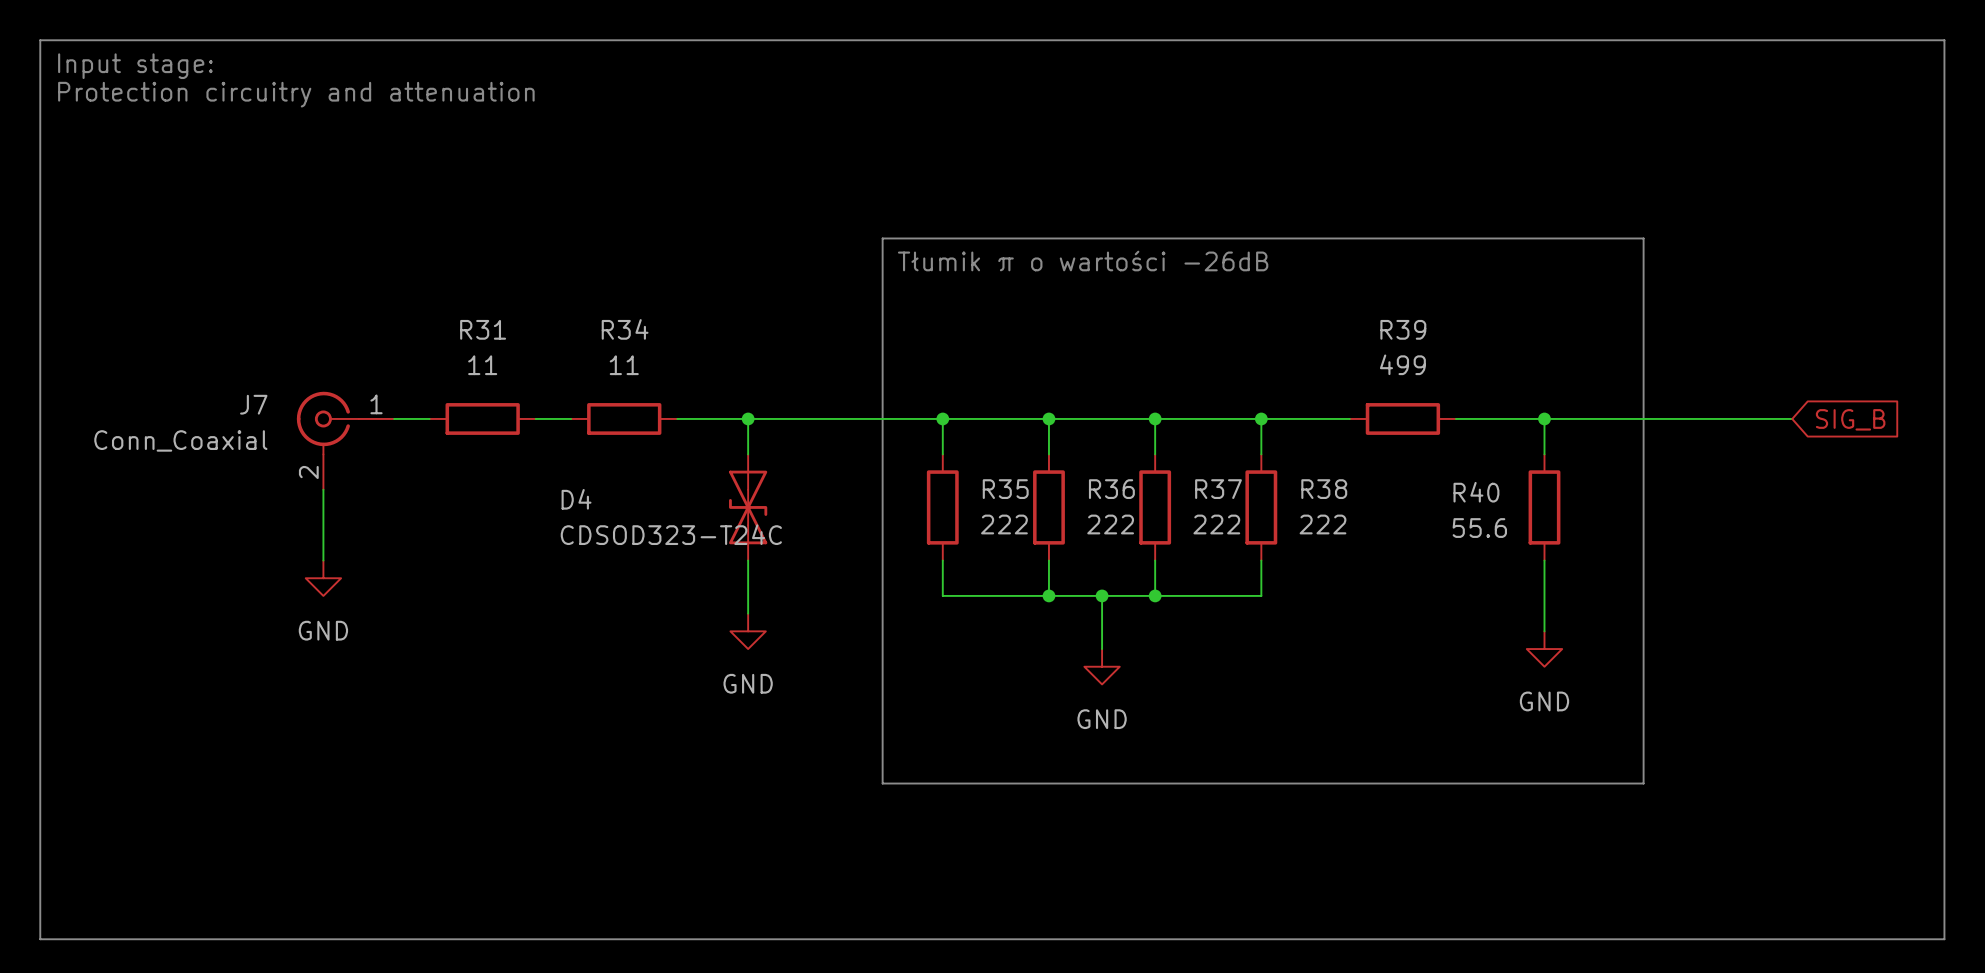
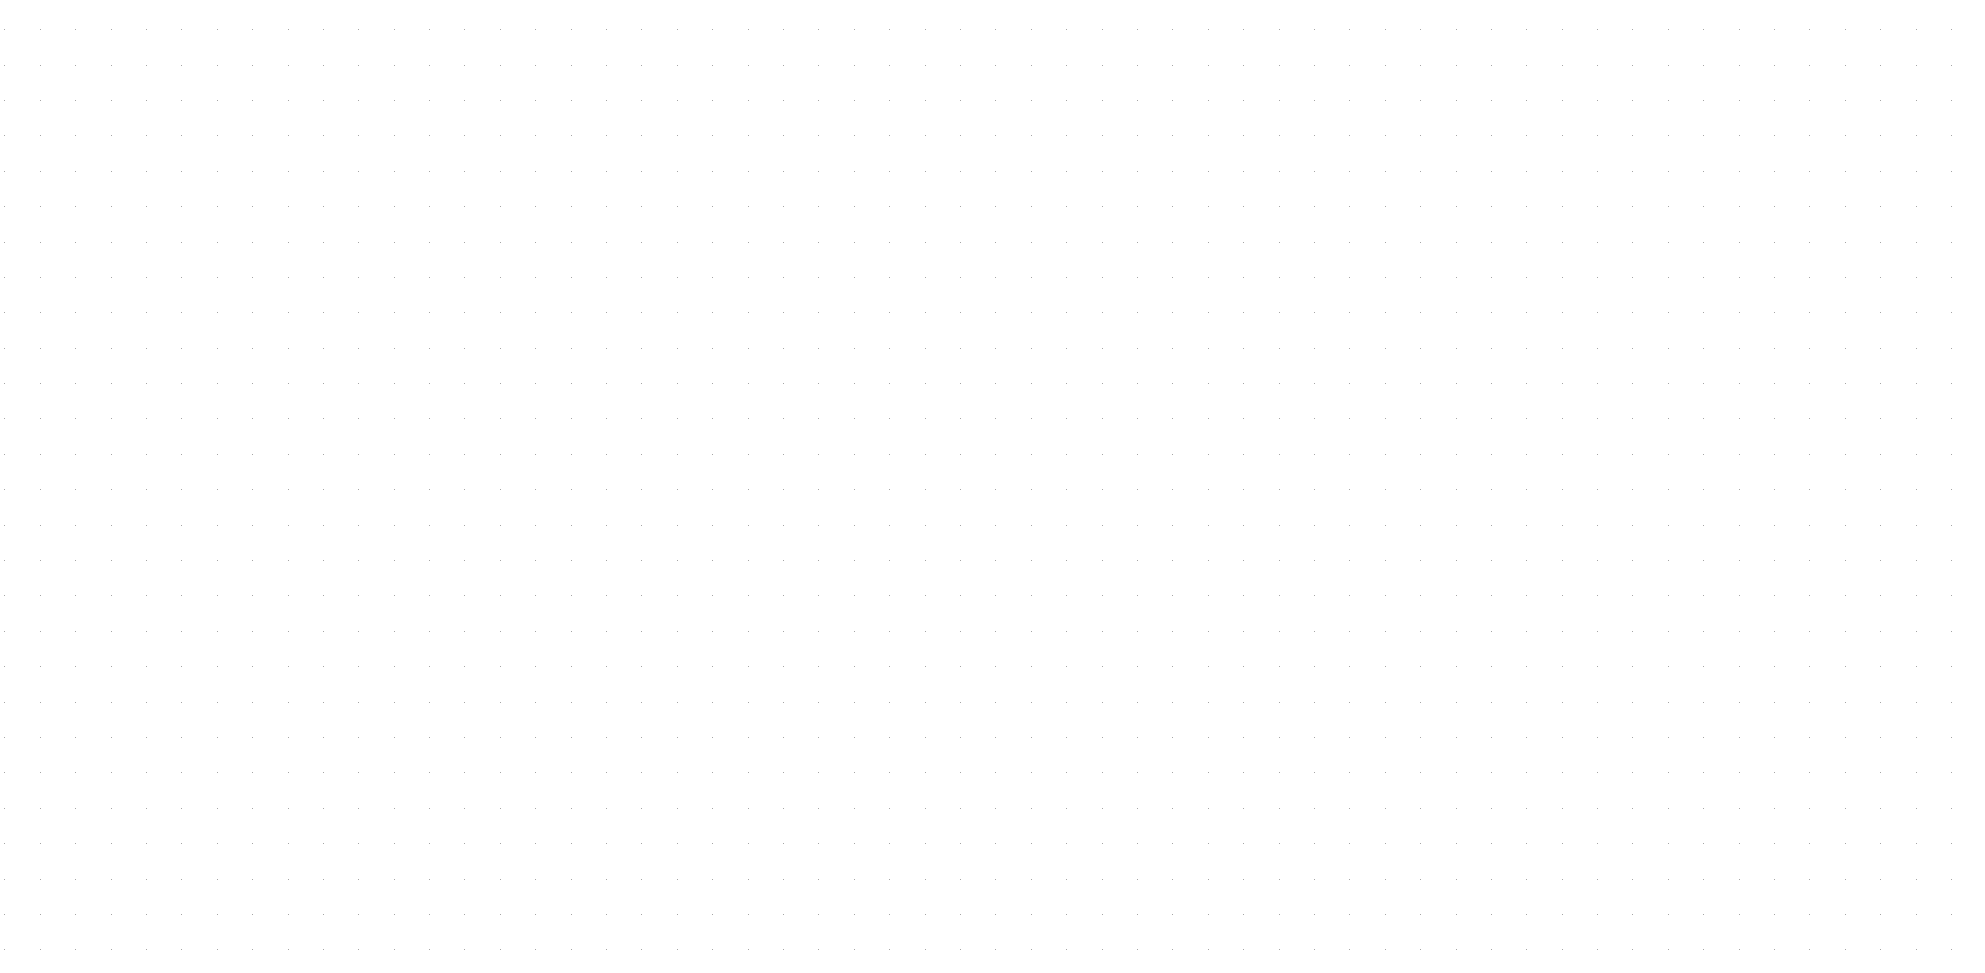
line: (40, 40) (1944, 40) (1944, 939) (40, 939) (40, 40) -> none
text: Input stage: (135, 66) -> none
text: Protection circuitry and attenuation (296, 94) -> none
line: (882, 238) (1643, 238) (1643, 783) (882, 783) (882, 238) -> none
text: Tłumik π o wartości -26dB (1083, 261) -> none
wire: (394, 418) (429, 418) -> none
R31: 11 (482, 418) -> none
wire: (535, 418) (571, 418) -> none
R34: 11 (624, 418) -> none
wire: (677, 418) (1349, 418) -> none
wire: (748, 418) (748, 454) -> none
junction: (748, 418) -> none
wire: (942, 418) (942, 454) -> none
junction: (942, 418) -> none
wire: (1048, 418) (1048, 454) -> none
junction: (1048, 418) -> none
wire: (1155, 418) (1155, 454) -> none
junction: (1155, 418) -> none
wire: (1261, 418) (1261, 454) -> none
junction: (1261, 418) -> none
R39: 499 (1402, 418) -> none
wire: (1456, 418) (1792, 418) -> none
wire: (1544, 418) (1544, 454) -> none
junction: (1544, 418) -> none
global label: SIG_B (1850, 419) -> none
J7: Conn_Coaxial (345, 440) -> none
wire: (323, 489) (323, 560) -> none
D4: CDSOD323-T24C (748, 507) -> none
R35: 222 (942, 507) -> none
R36: 222 (1048, 507) -> none
R37: 222 (1155, 507) -> none
R38: 222 (1261, 507) -> none
R40: 55.6 (1544, 507) -> none
wire: (748, 560) (748, 613) -> none
wire: (942, 560) (942, 595) (1261, 595) (1261, 560) -> none
wire: (1048, 560) (1048, 595) -> none
wire: (1155, 560) (1155, 595) -> none
wire: (1544, 560) (1544, 631) -> none
power symbol: GND (323, 578) -> none
junction: (1048, 595) -> none
wire: (1102, 595) (1102, 649) -> none
junction: (1102, 595) -> none
junction: (1155, 595) -> none
power symbol: GND (748, 631) -> none
power symbol: GND (1544, 649) -> none
power symbol: GND (1102, 666) -> none

